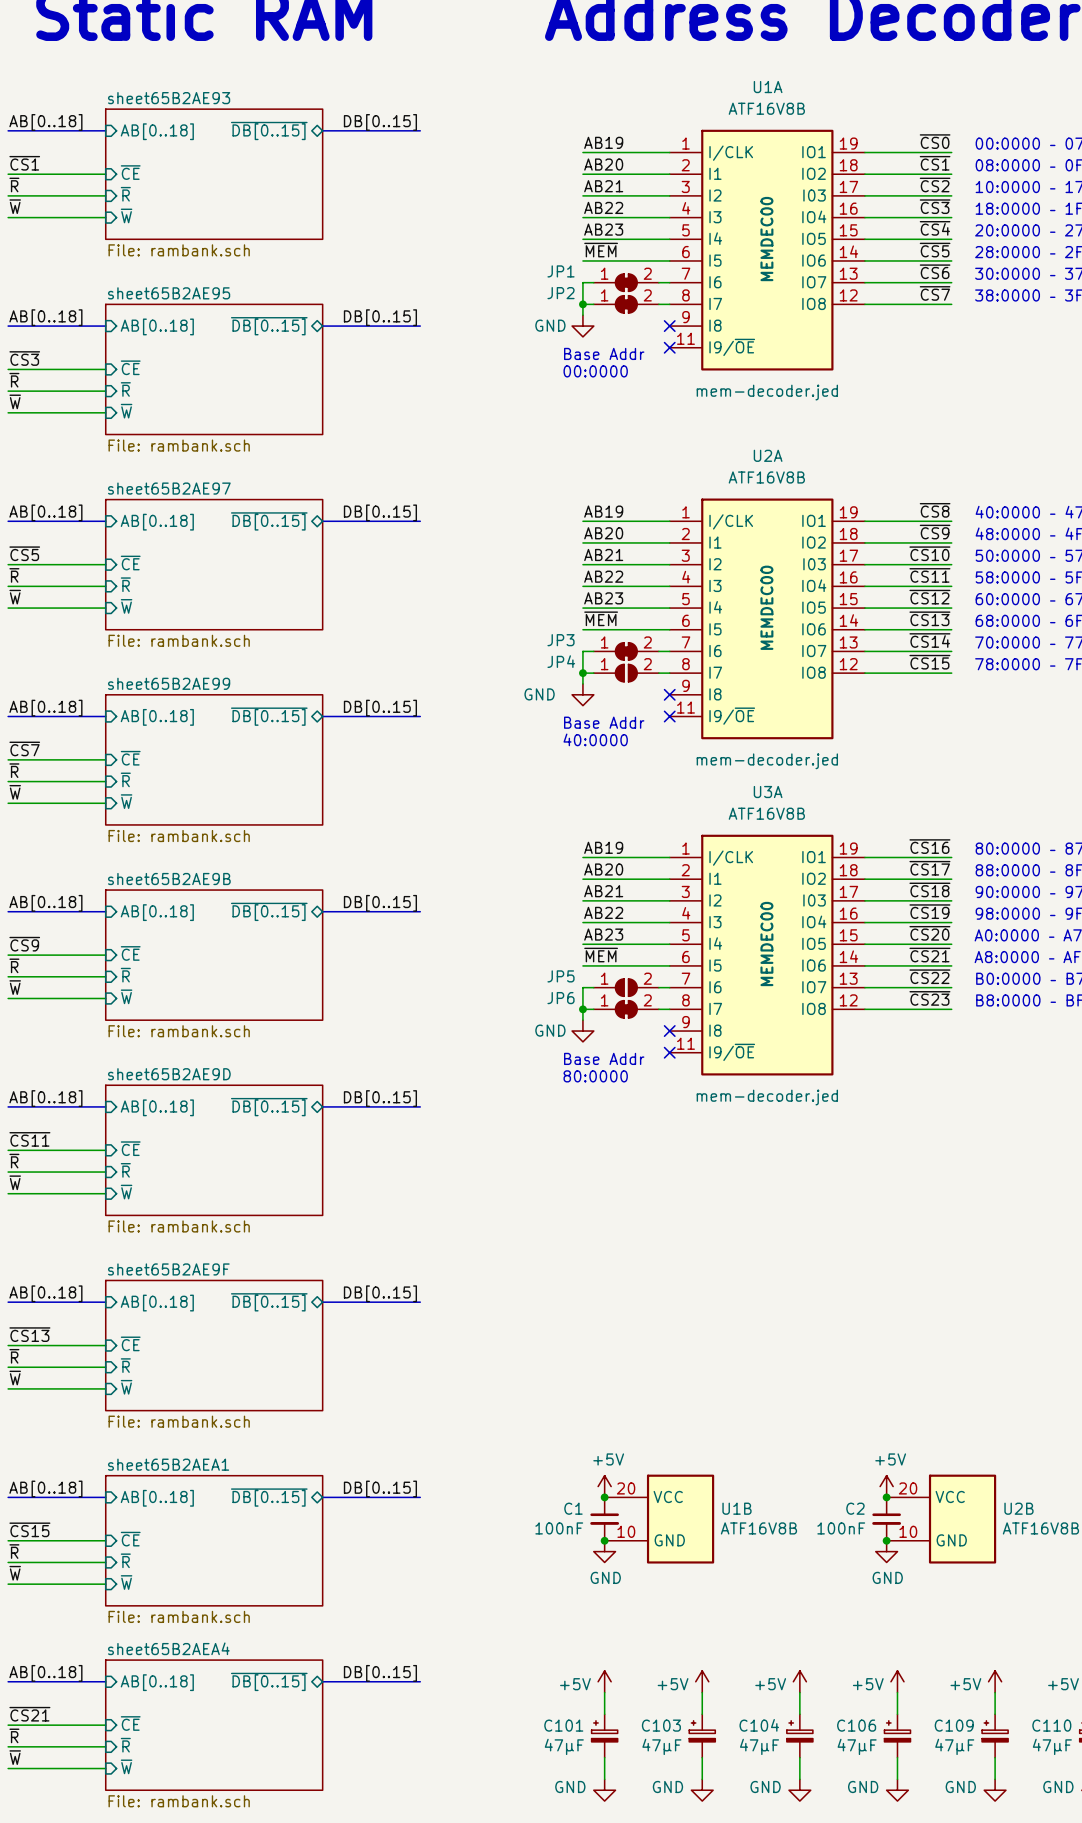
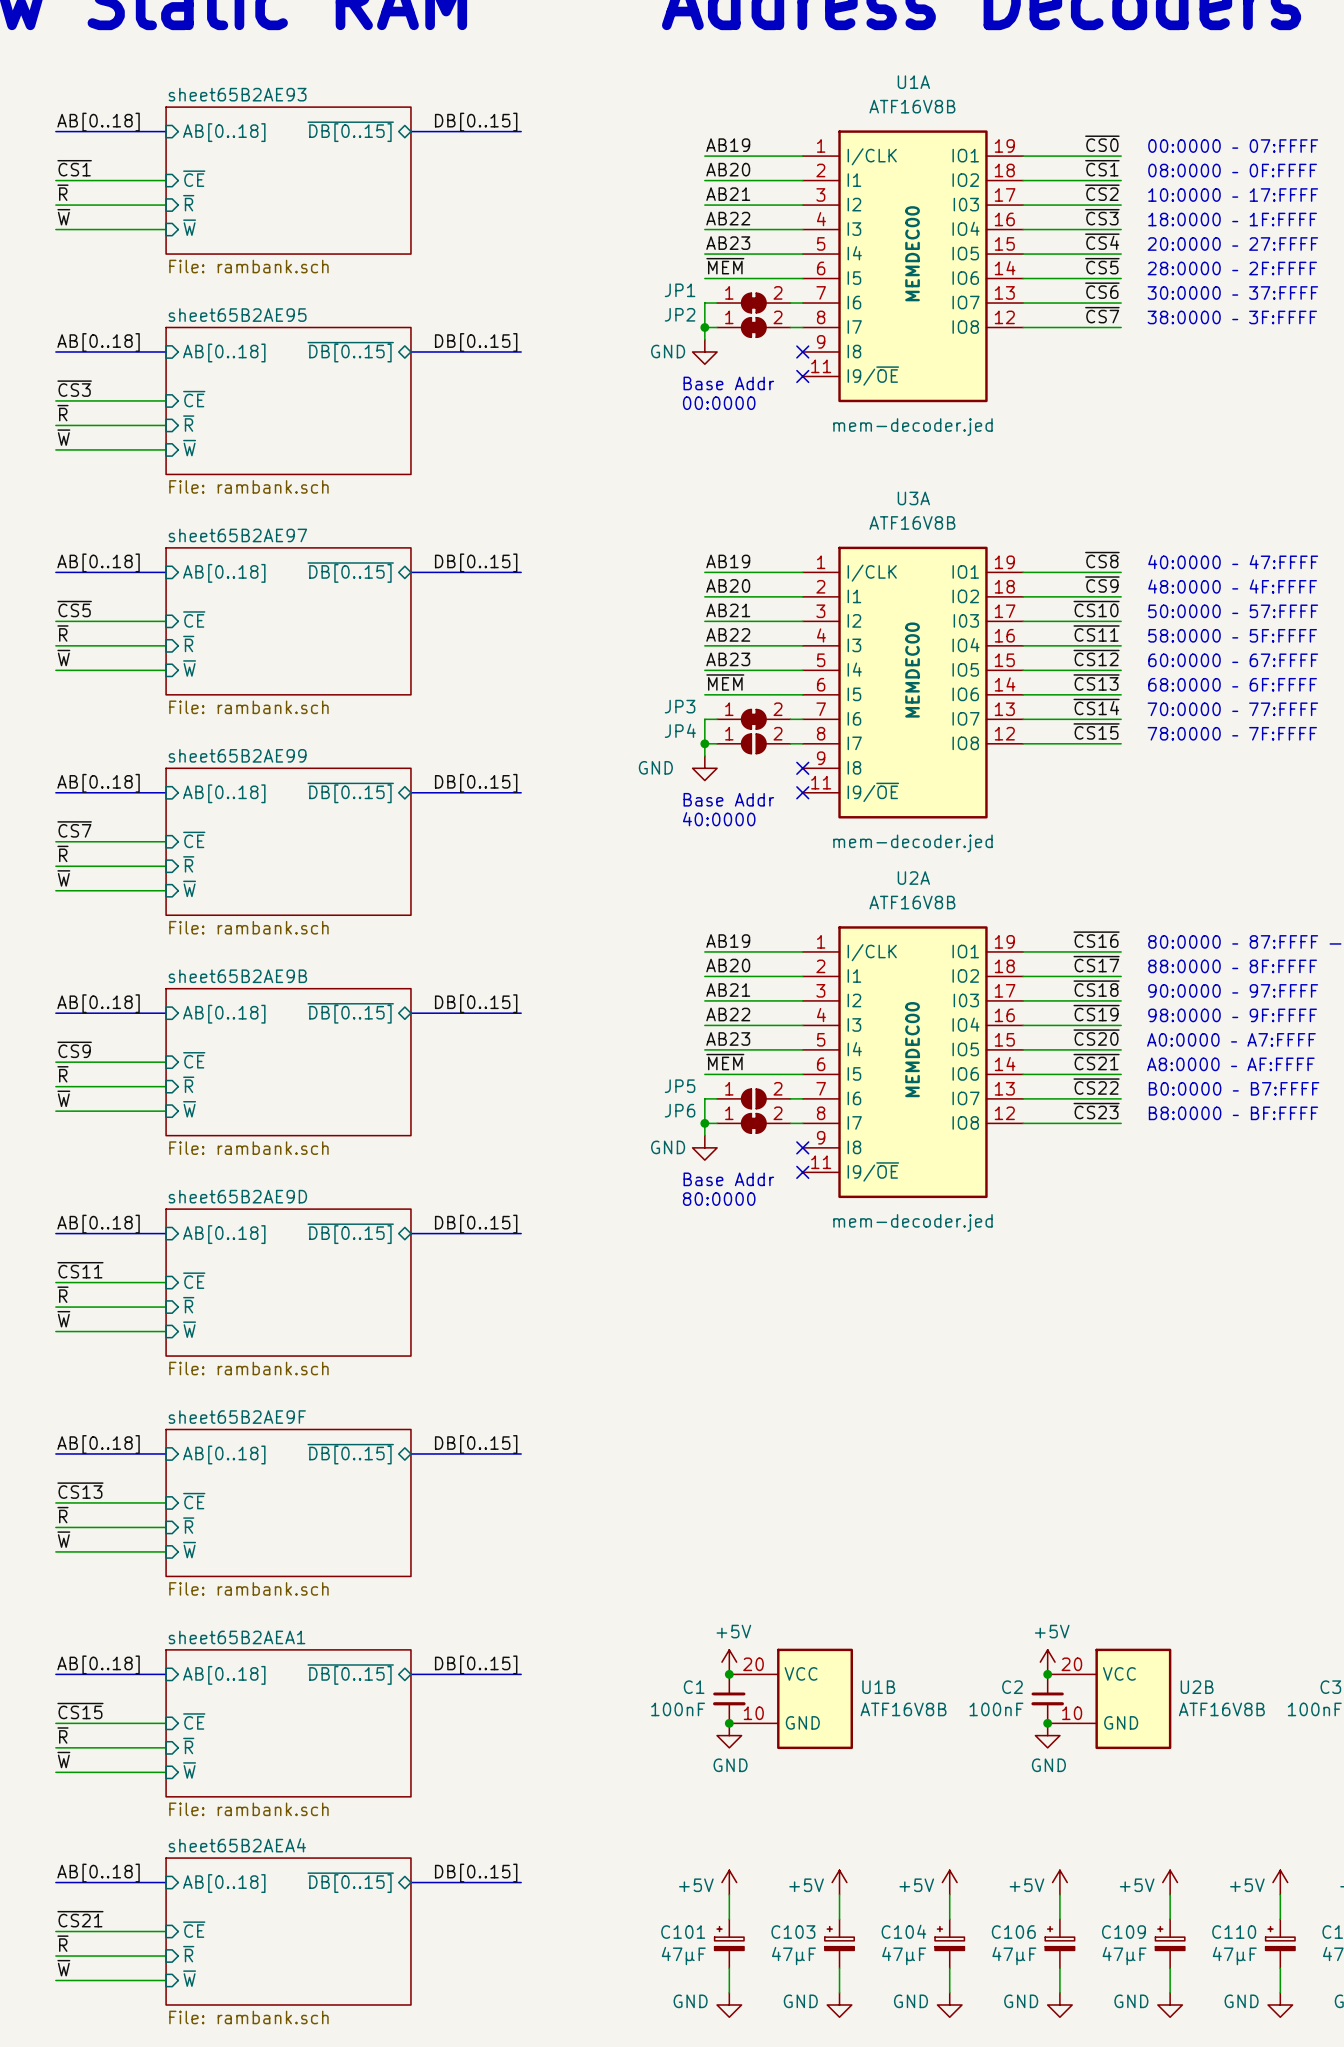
U2A name: U2A (768, 455) -> U3A (913, 498)
U3A name: U3A (768, 792) -> U2A (913, 878)

